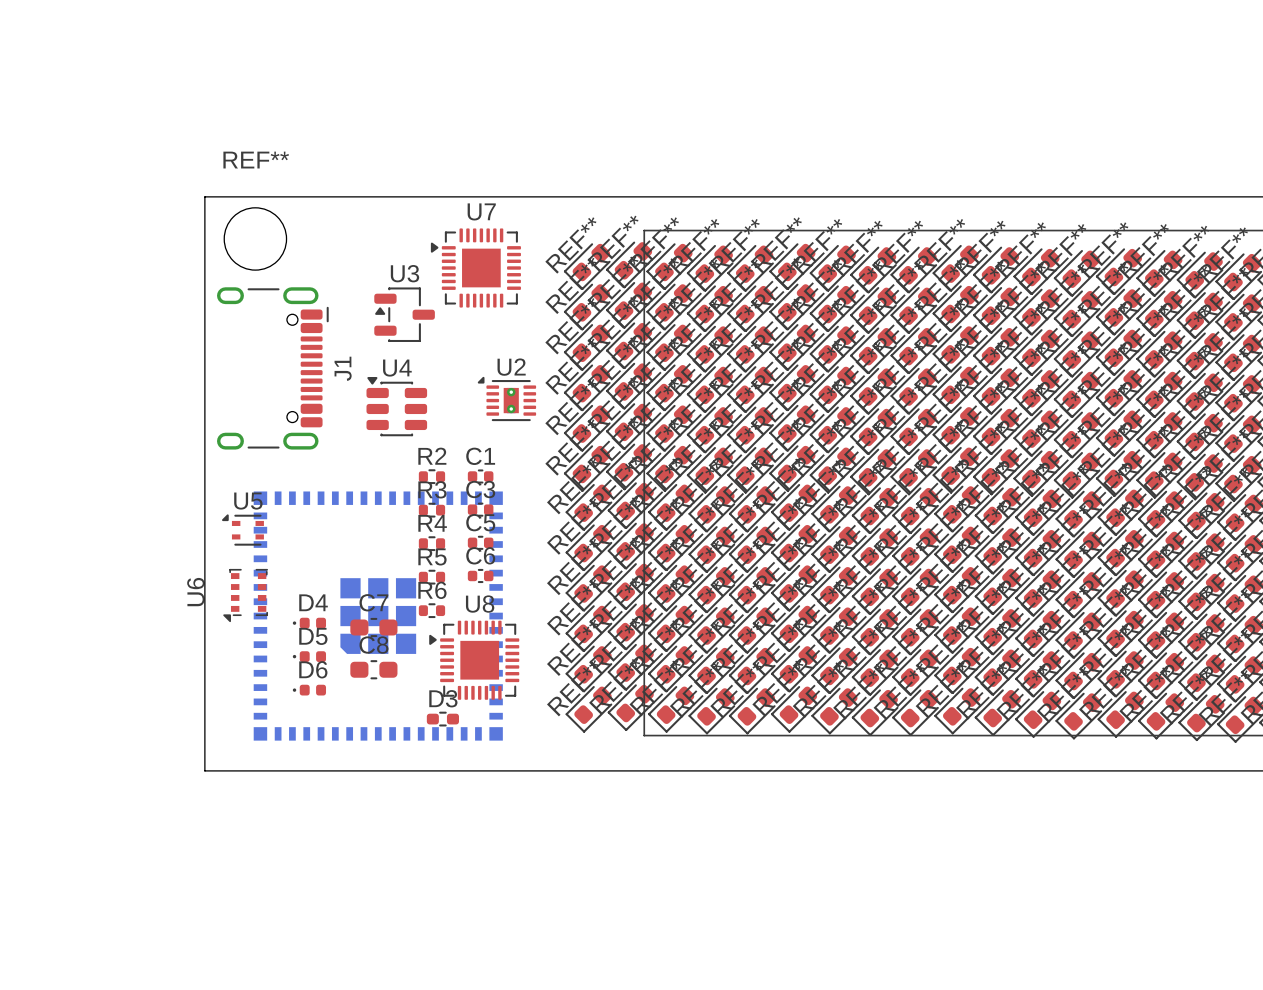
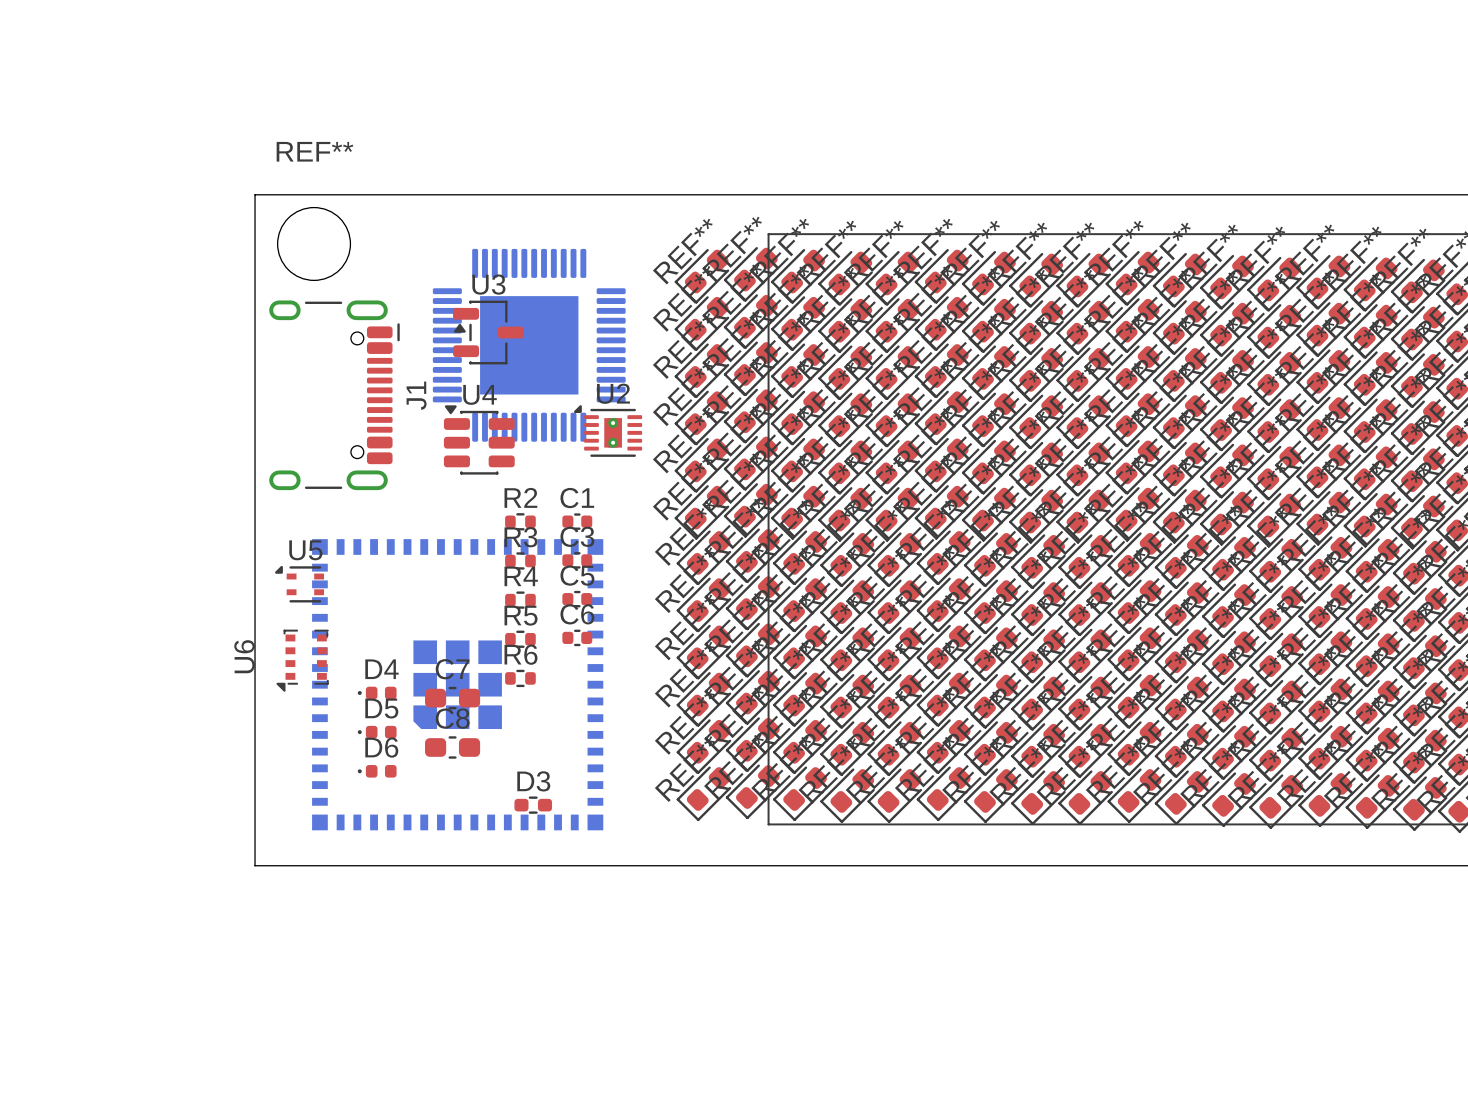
U7: (475, 268) -> none
part: none -> (529, 345)
U8: (474, 660) -> none

